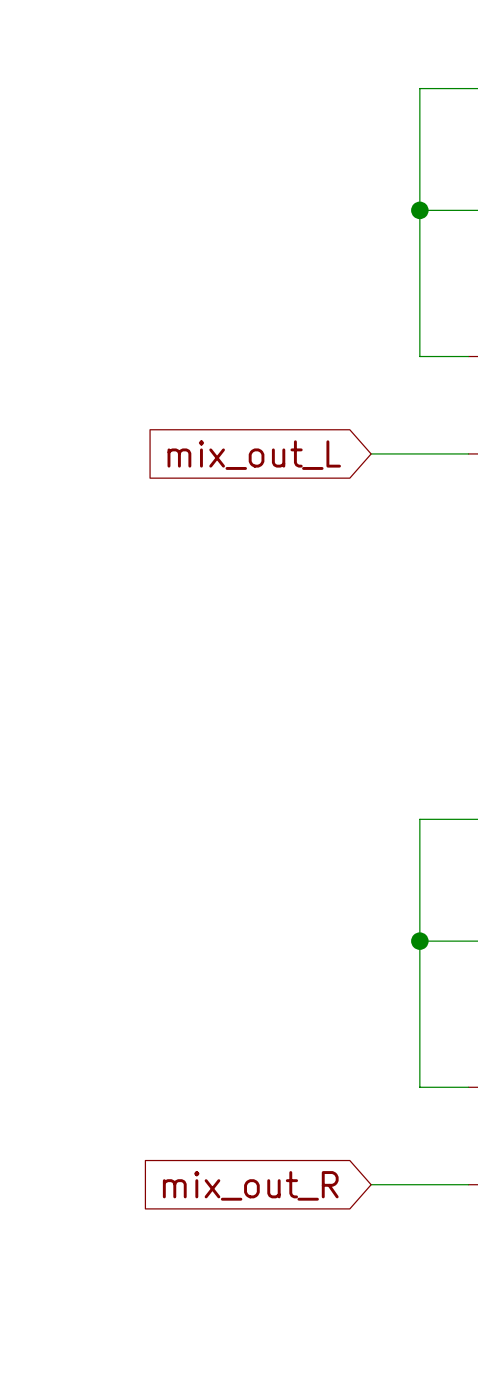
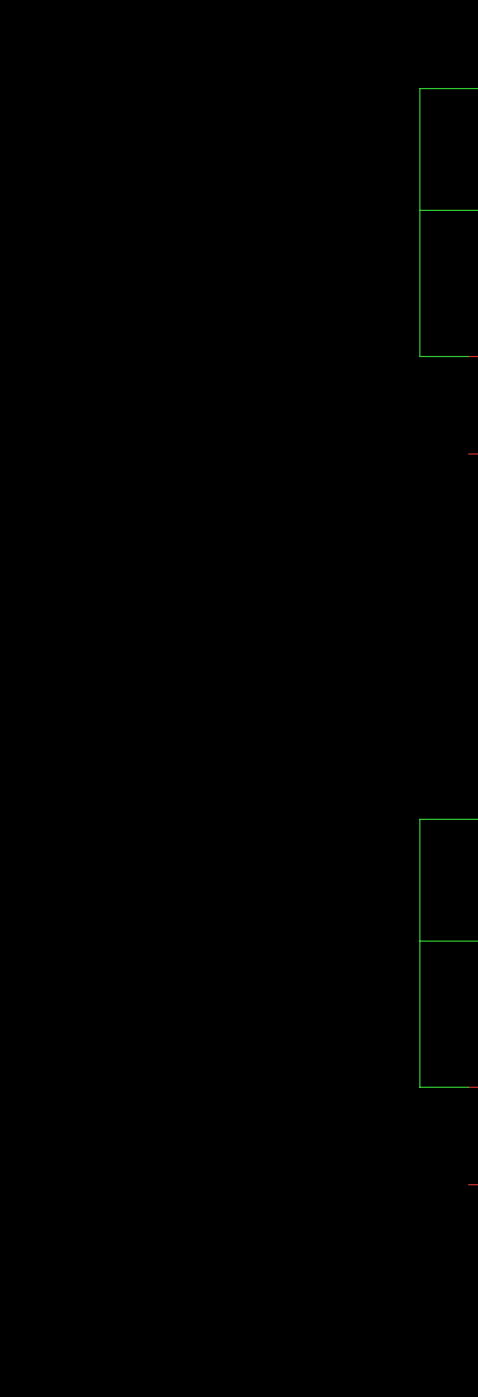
junction: (419, 210) -> none
wire: (371, 453) (468, 453) -> none
global label: mix_out_L (254, 455) -> none
junction: (419, 941) -> none
wire: (371, 1184) (468, 1184) -> none
global label: mix_out_R (250, 1185) -> none

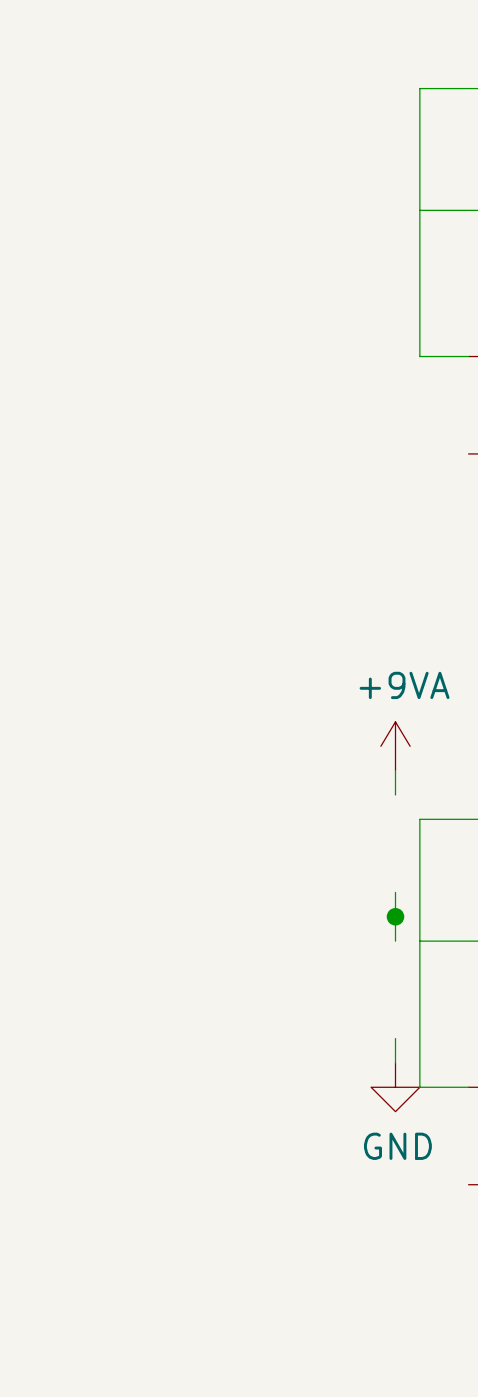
power symbol: none -> +9VA (395, 746)
wire: none -> (395, 770) (395, 794)
wire: none -> (395, 892) (395, 941)
junction: none -> (395, 916)
wire: none -> (395, 1038) (395, 1062)
power symbol: none -> GND (395, 1087)

